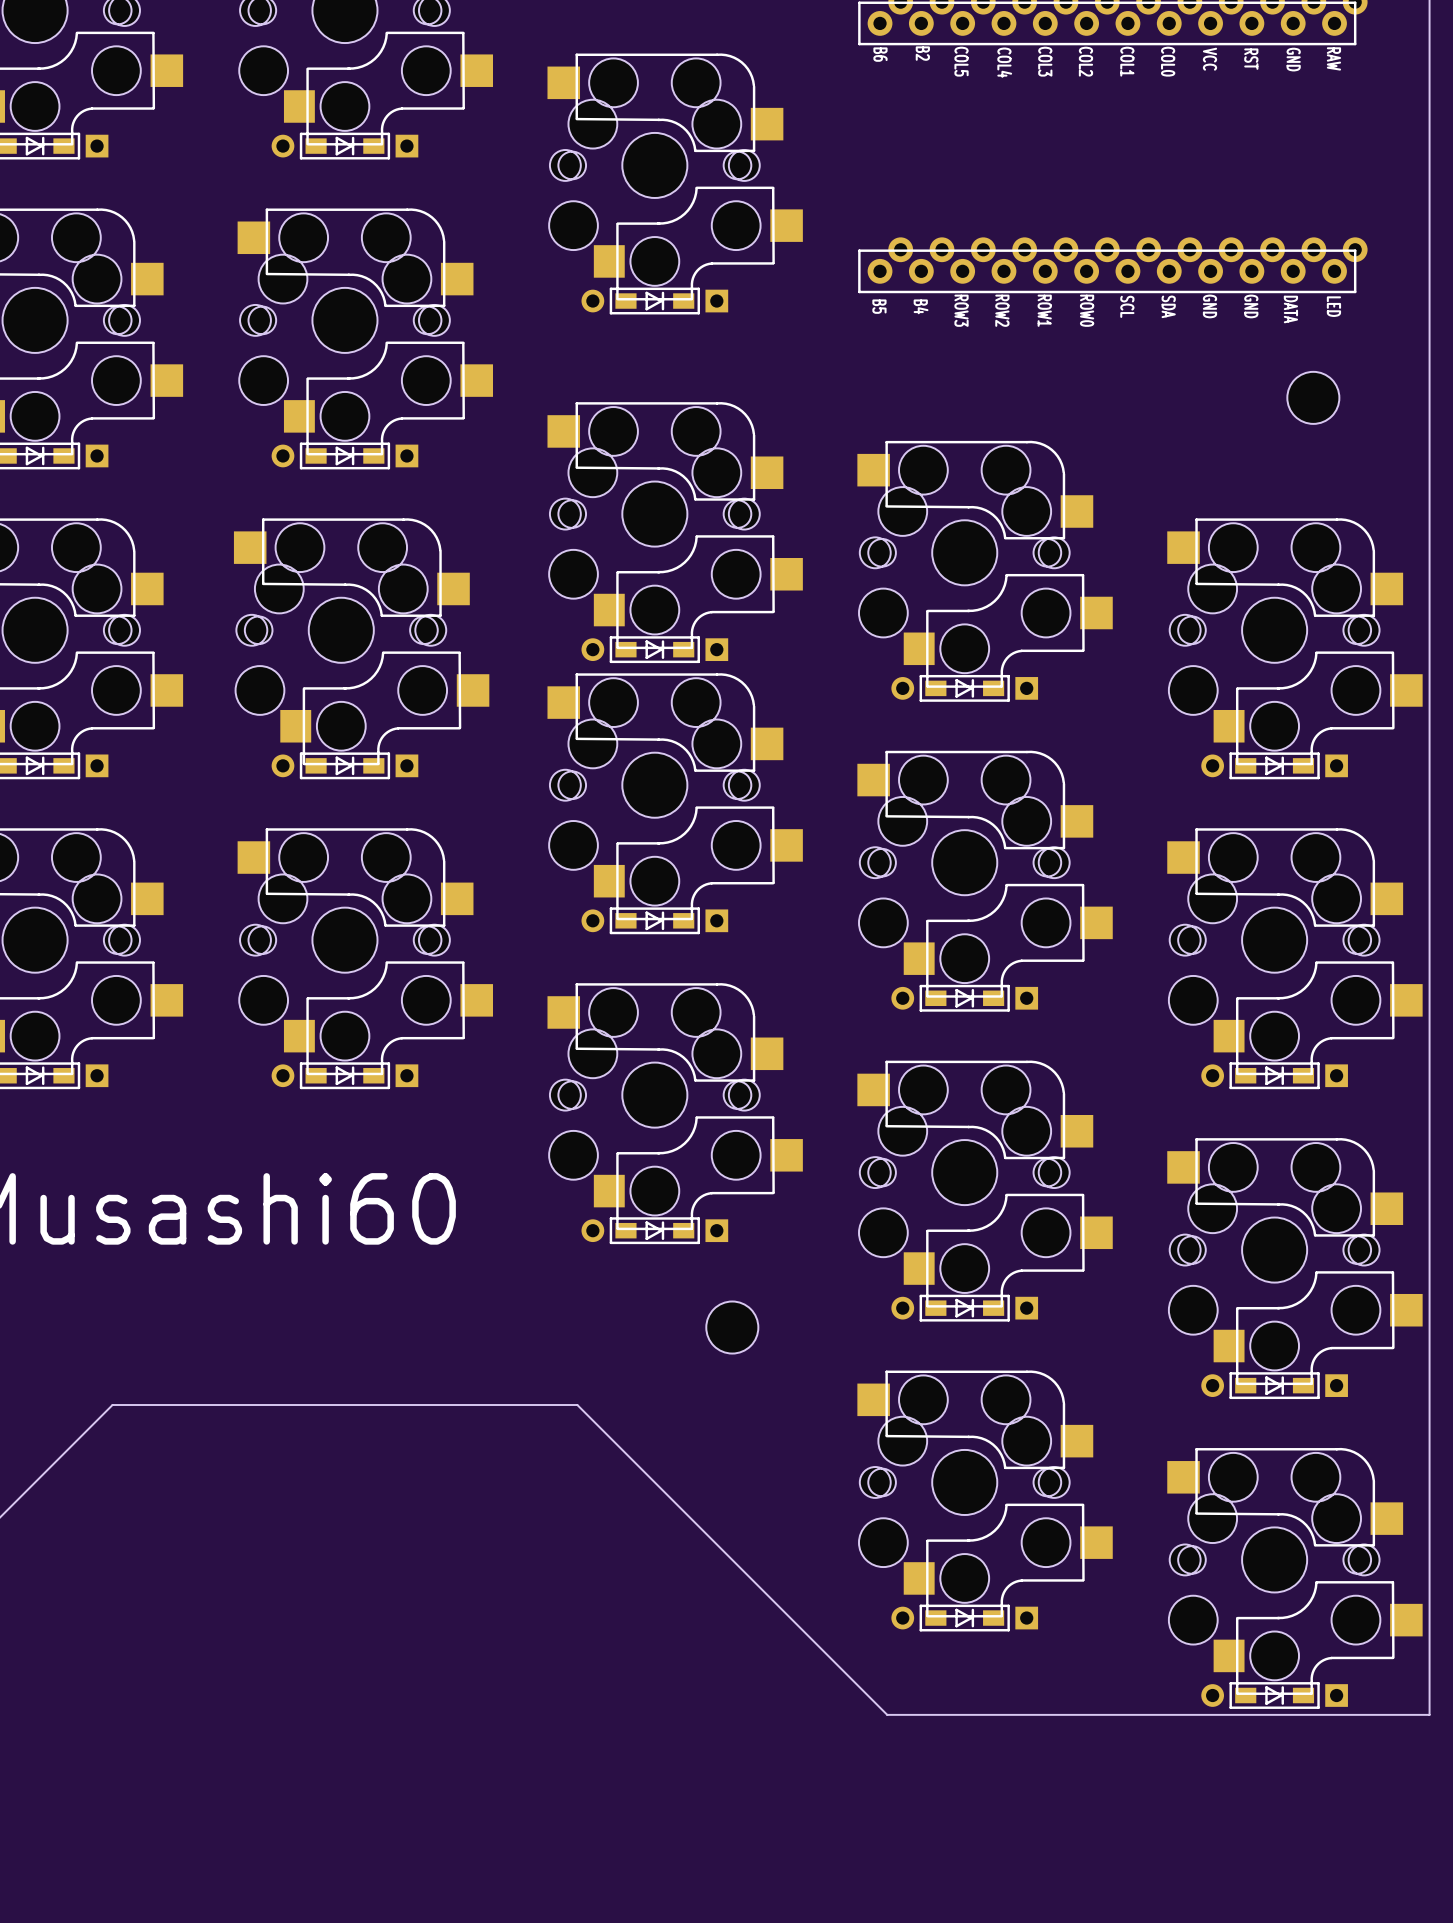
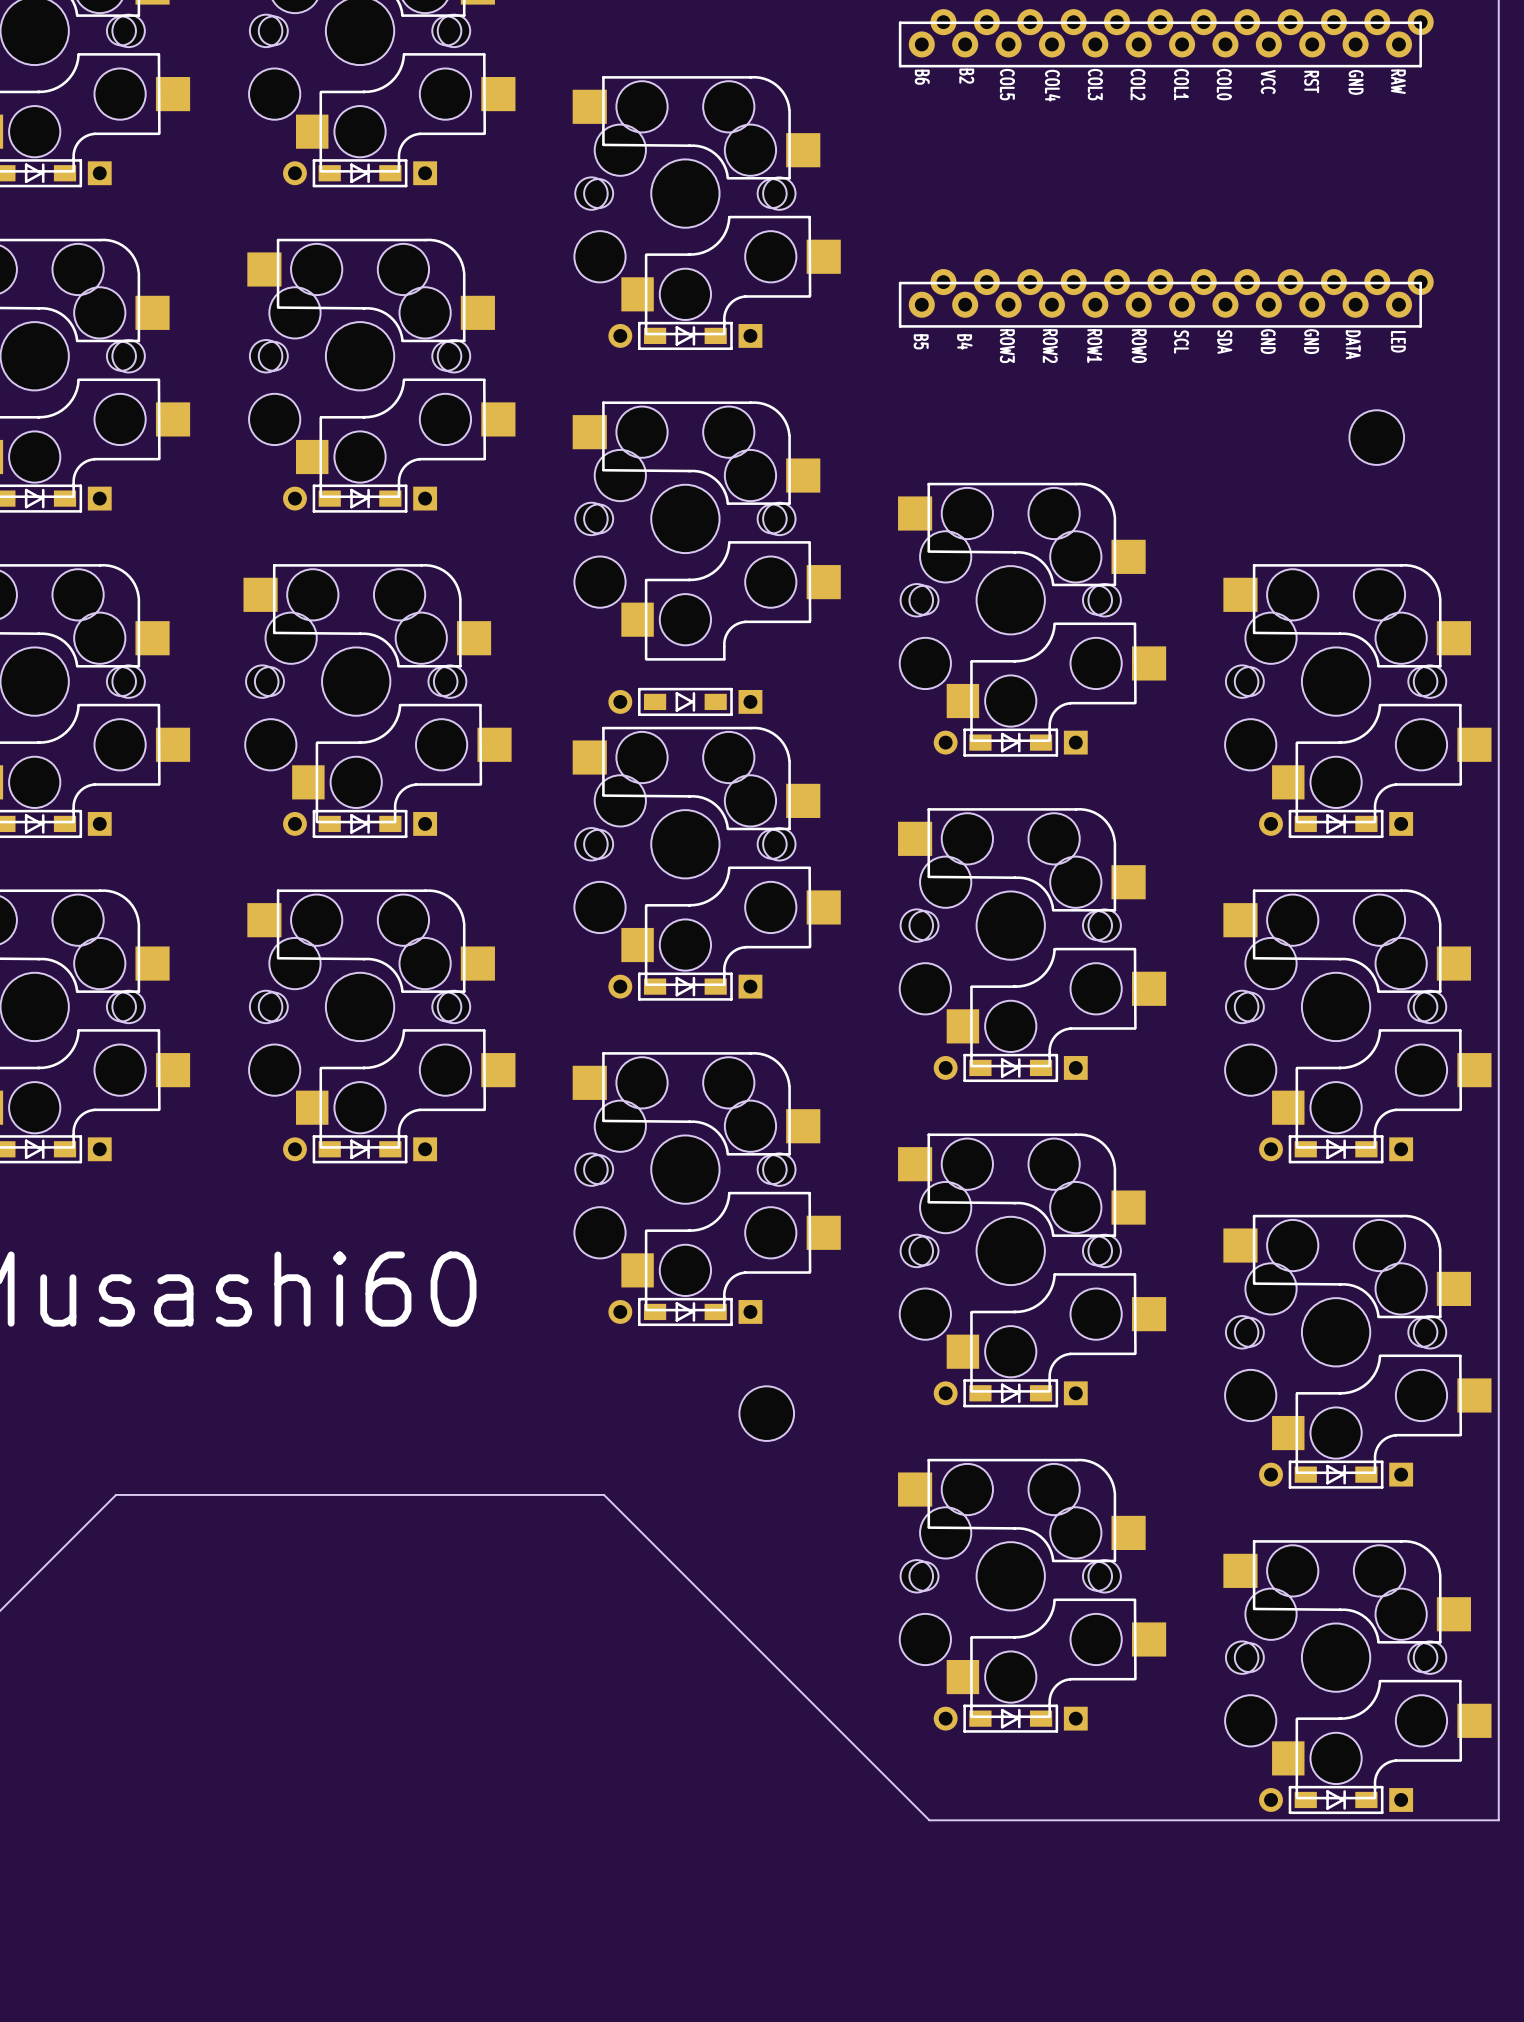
part position: (675, 525) -> (706, 531)

